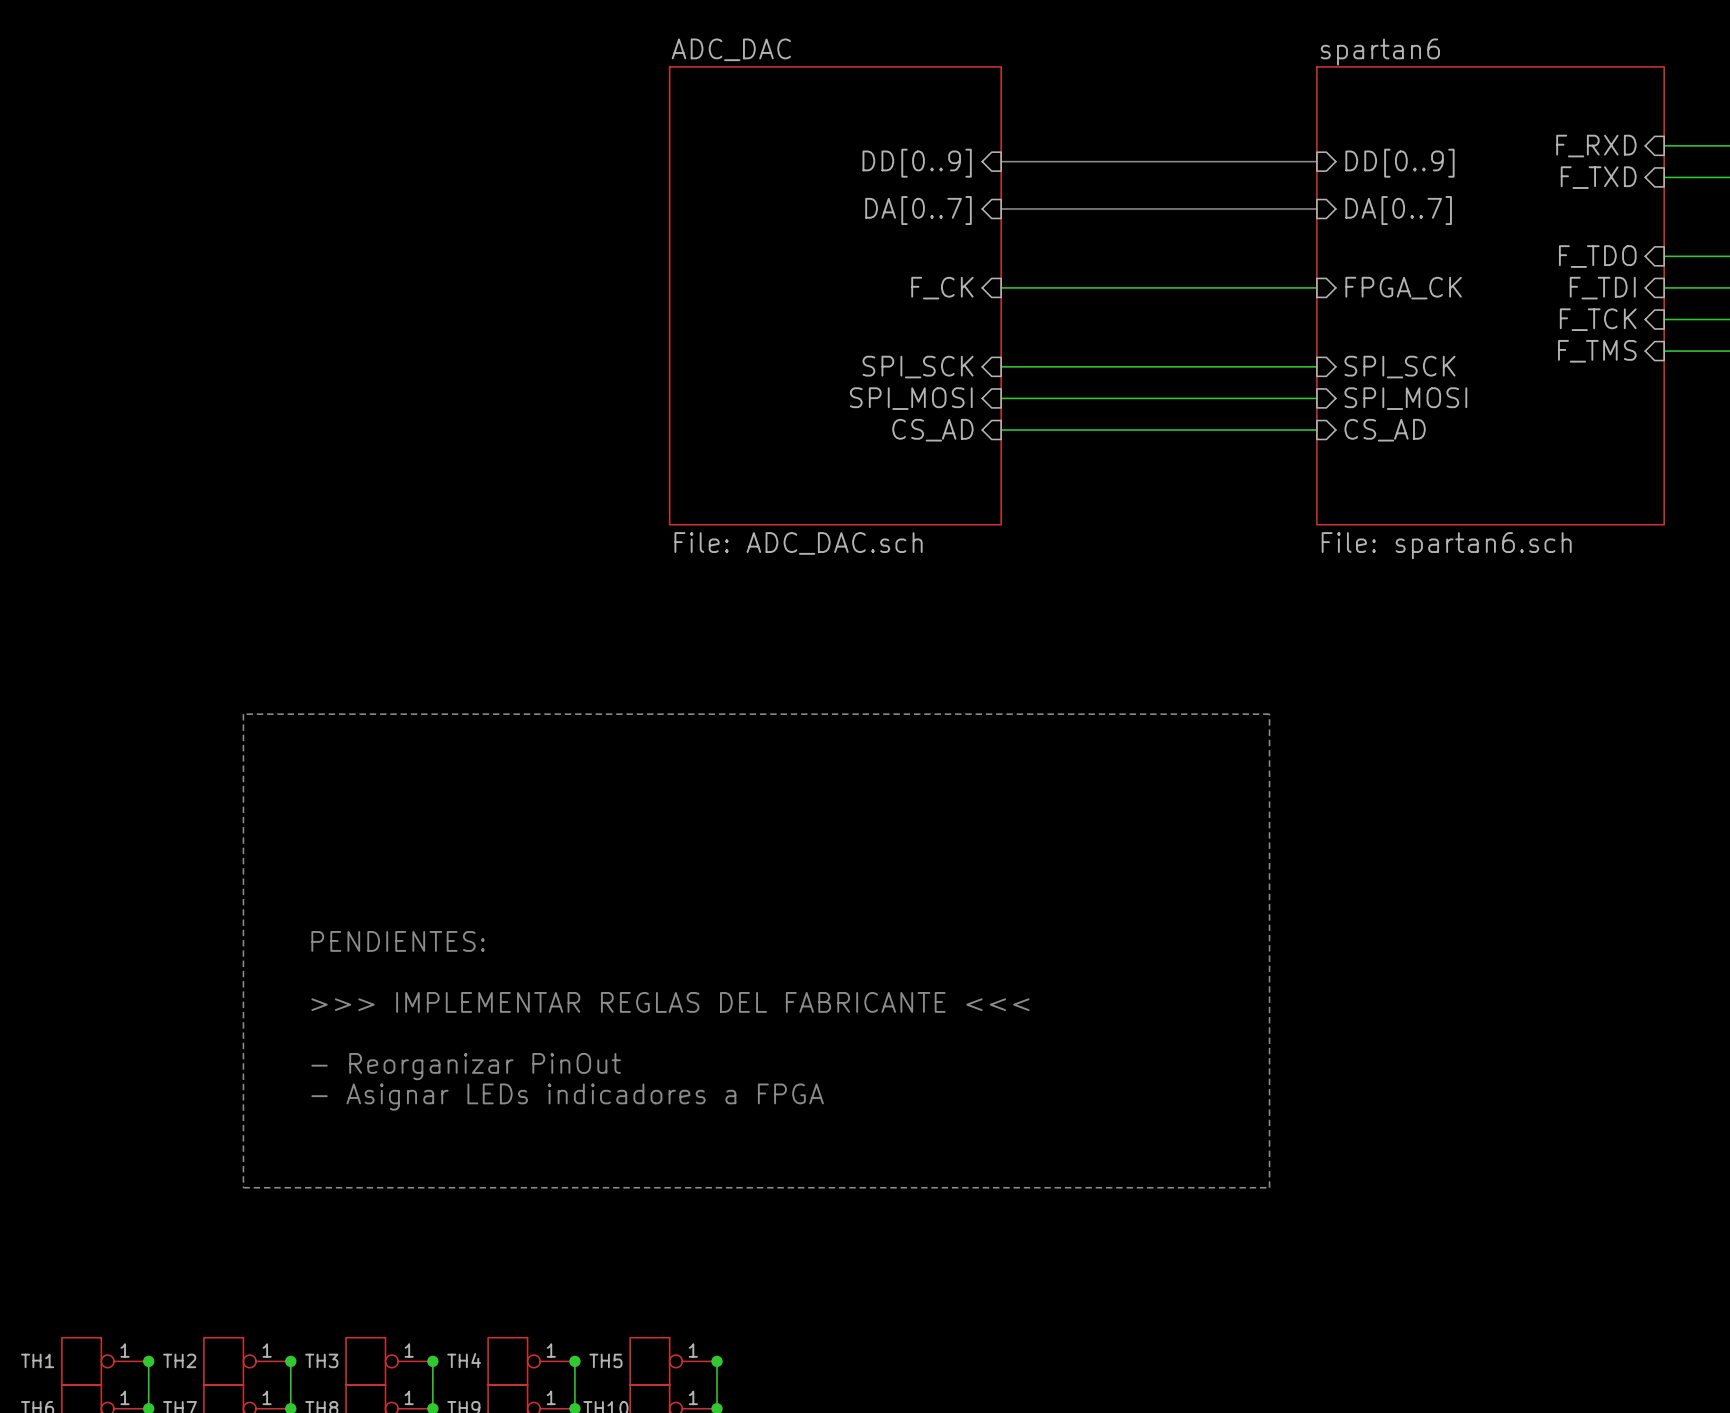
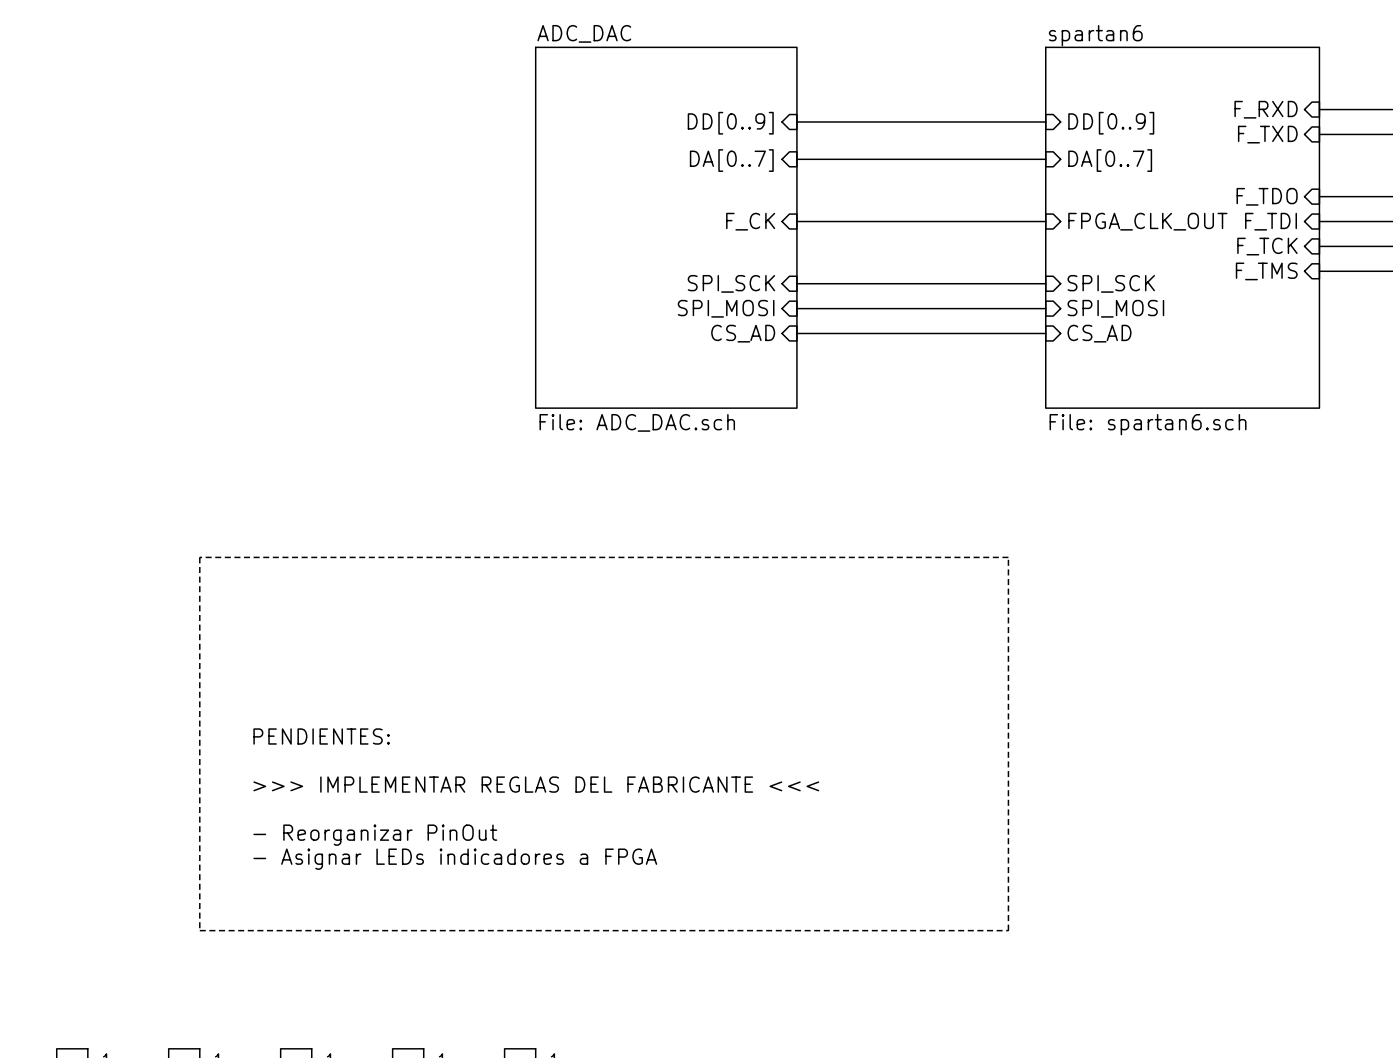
sheet pin: FPGA_CK (1403, 288) -> FPGA_CLK_OUT (1147, 221)

